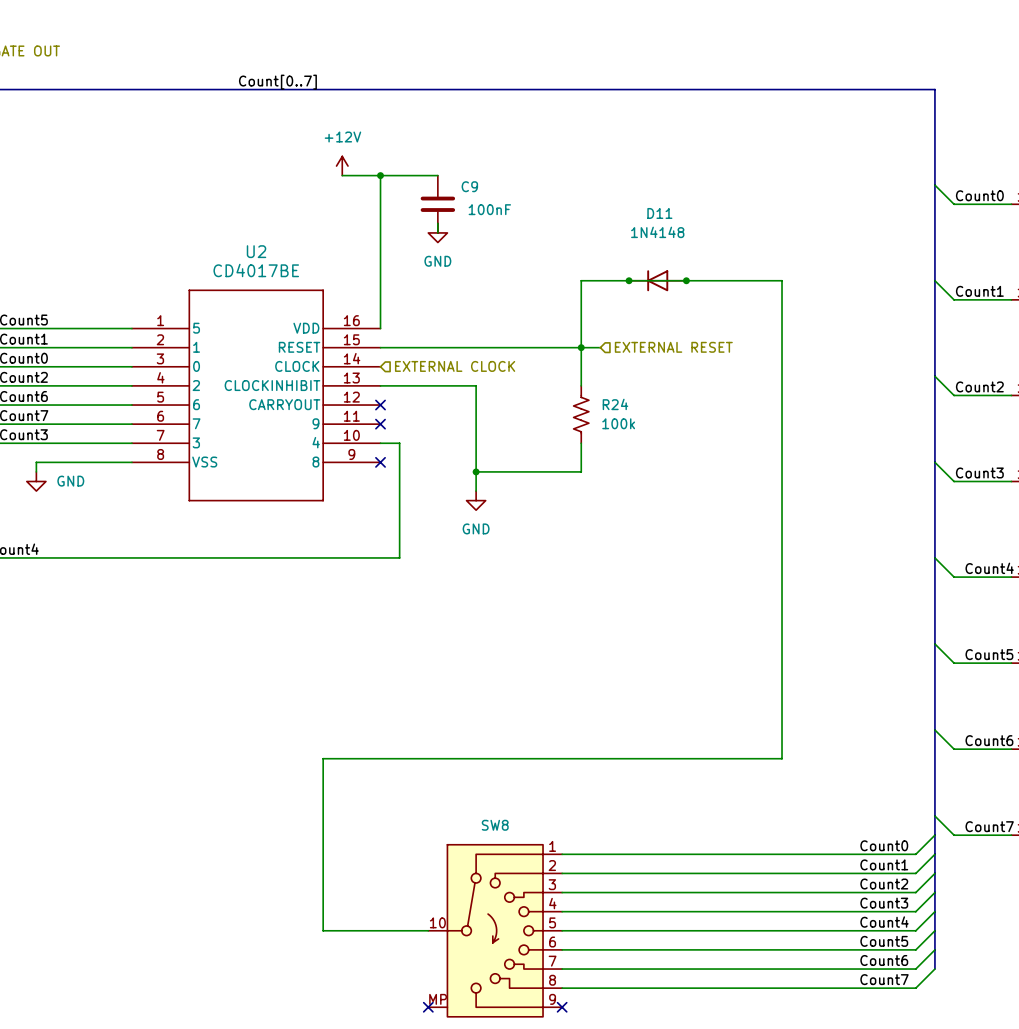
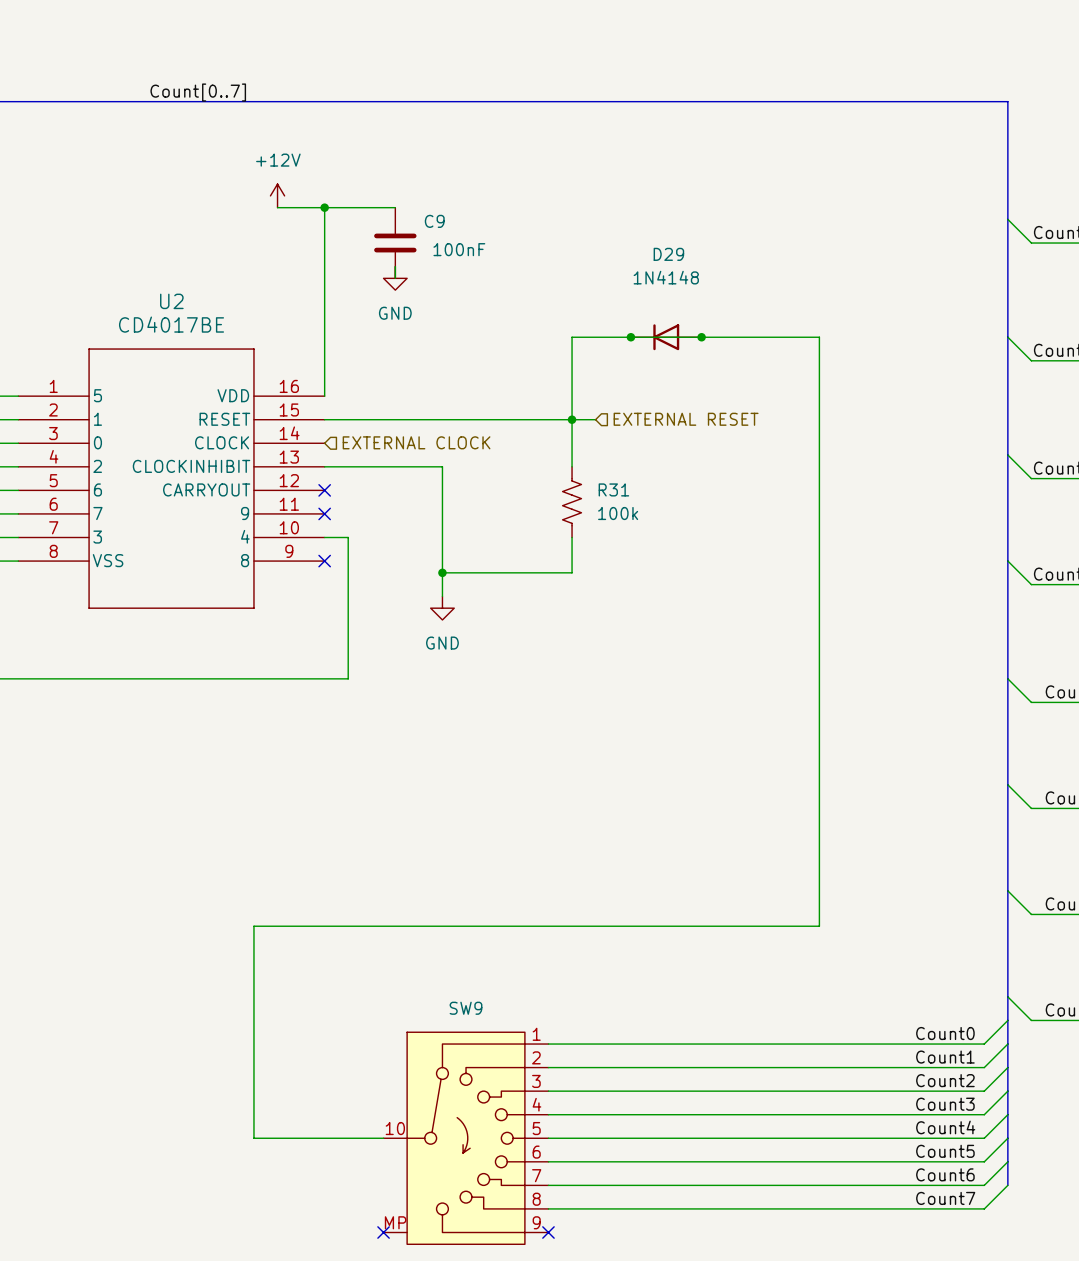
D11 name: D11 (659, 213) -> D29 (668, 254)
R24 name: R24 (615, 404) -> R31 (613, 489)
SW8 name: SW8 (495, 825) -> SW9 (466, 1008)

